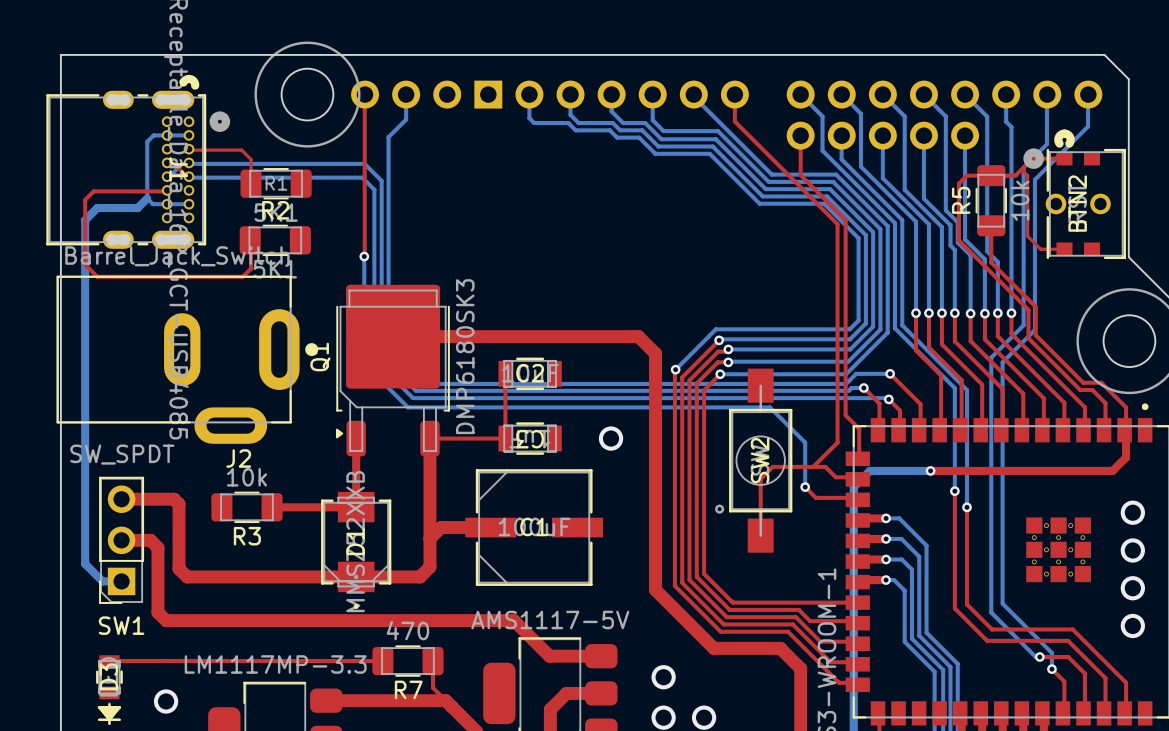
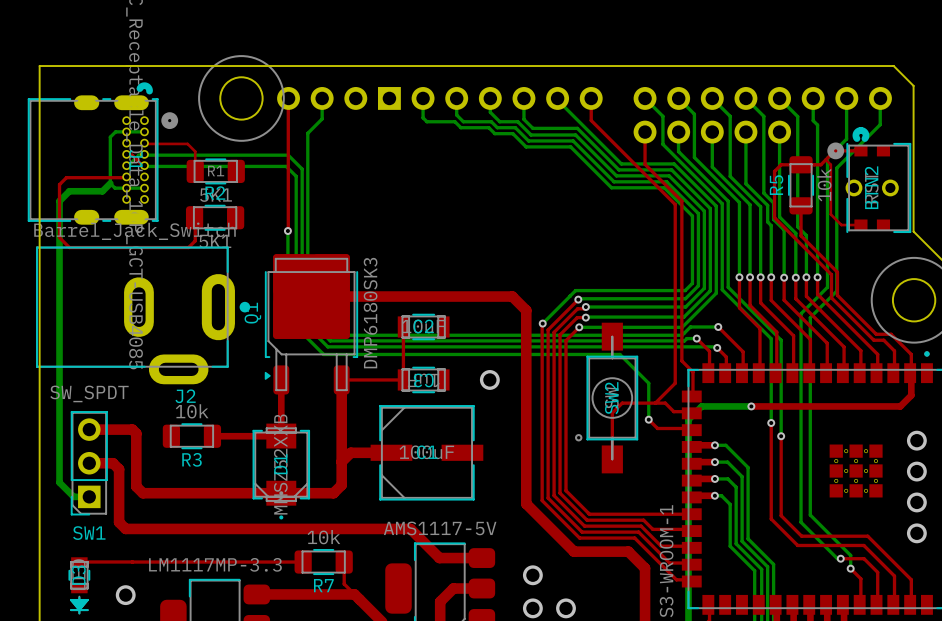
R7 value: 470 (407, 630) -> 10k (323, 537)

